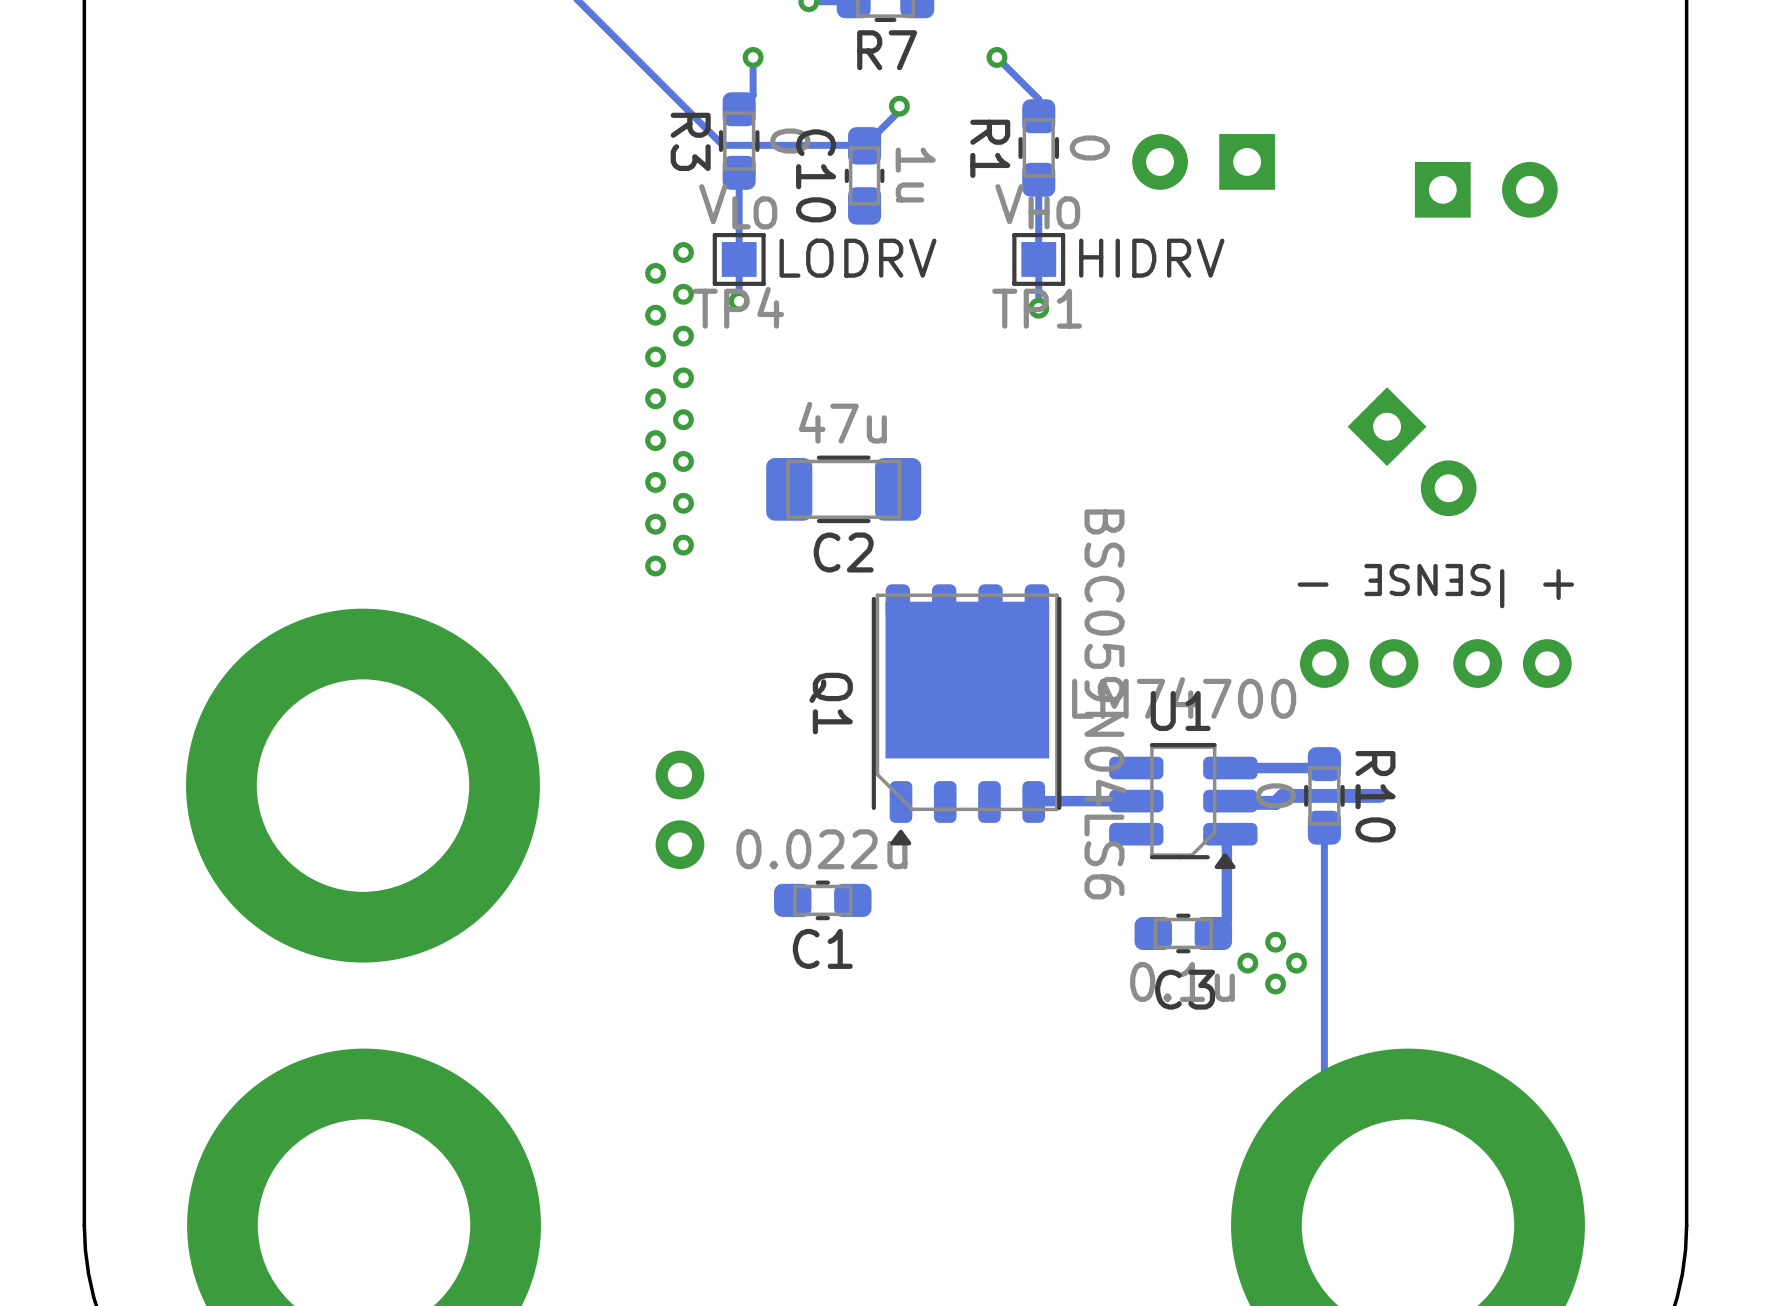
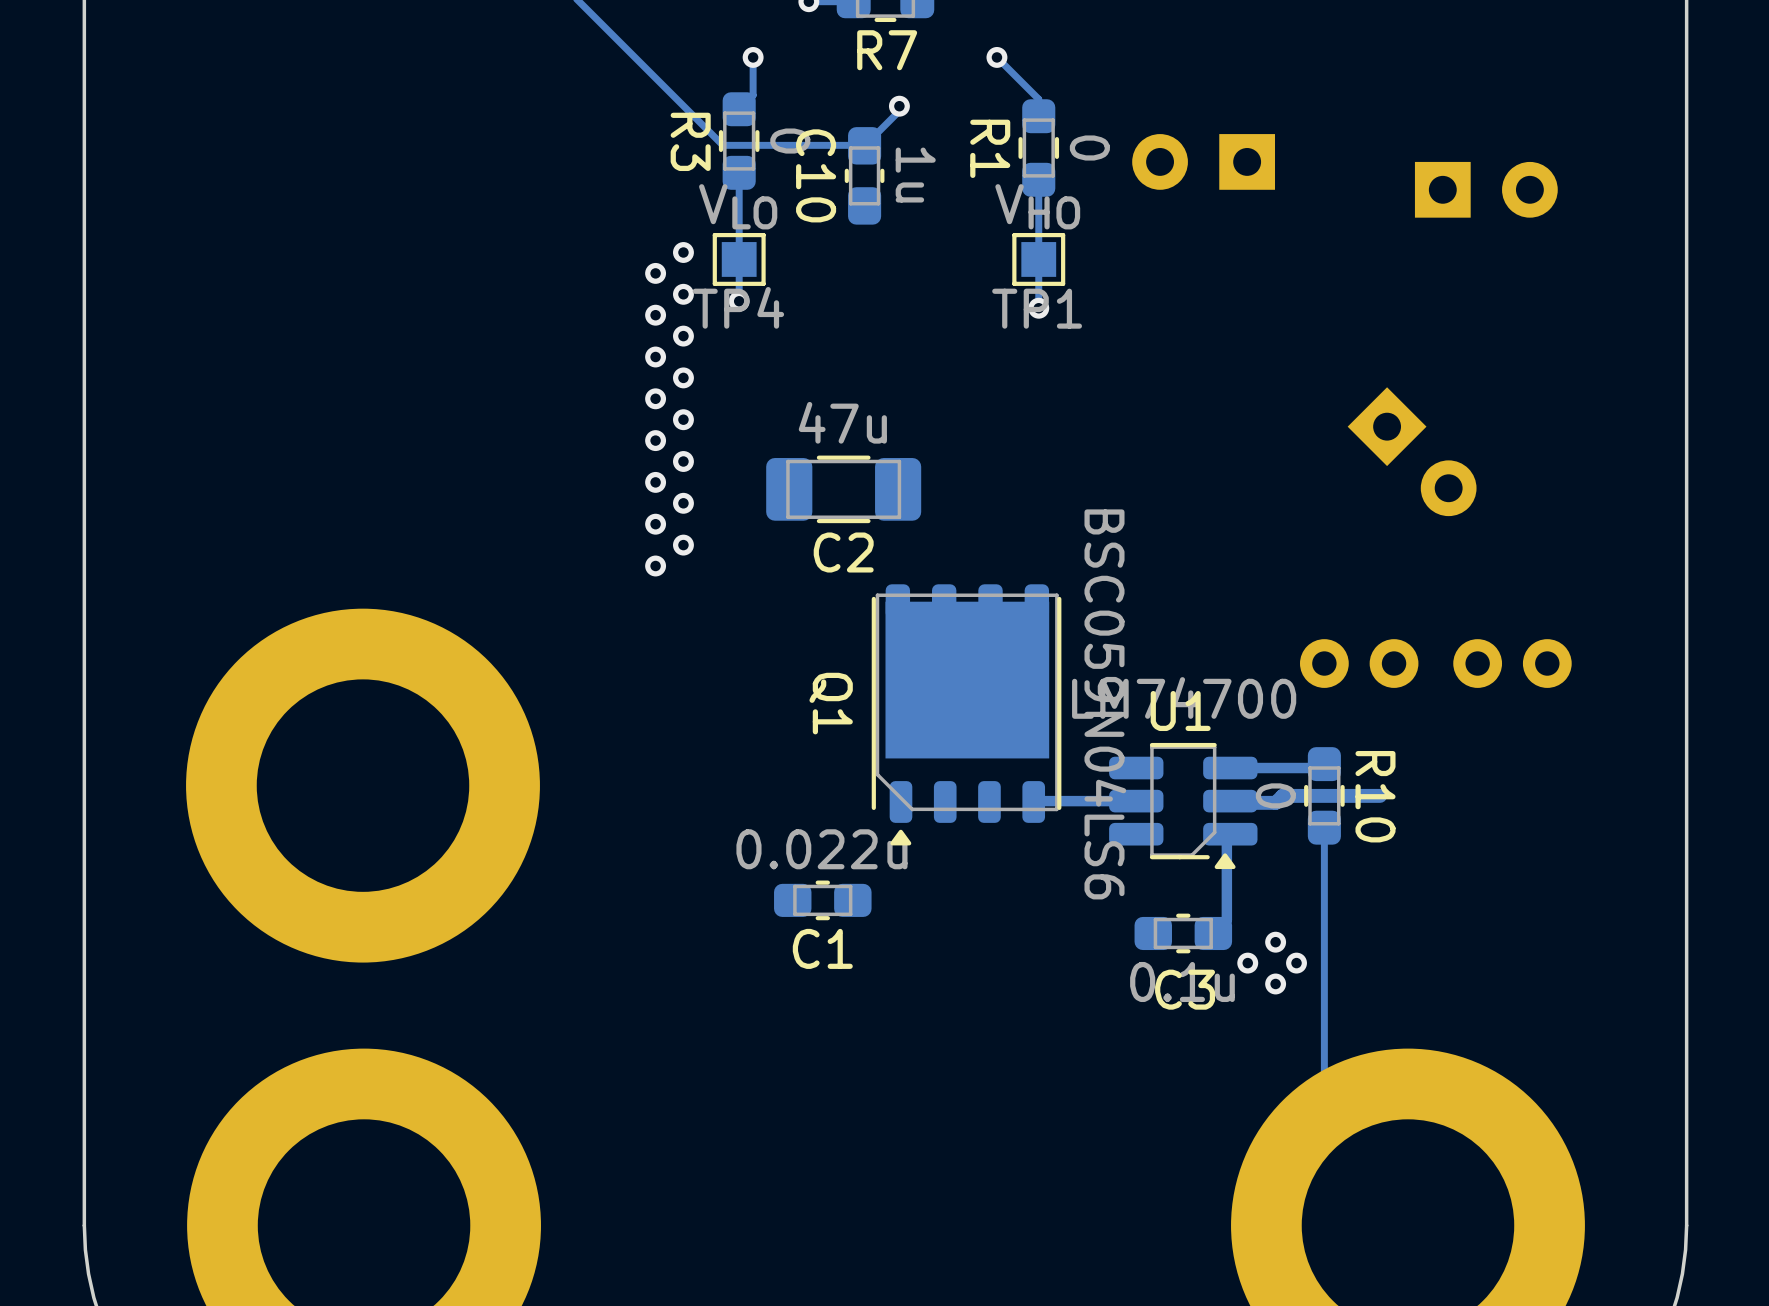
text: LODRV (858, 258) -> none
text: HIDRV (1151, 258) -> none
text: + ISENSE - (1435, 586) -> none
part: (679, 809) -> none

